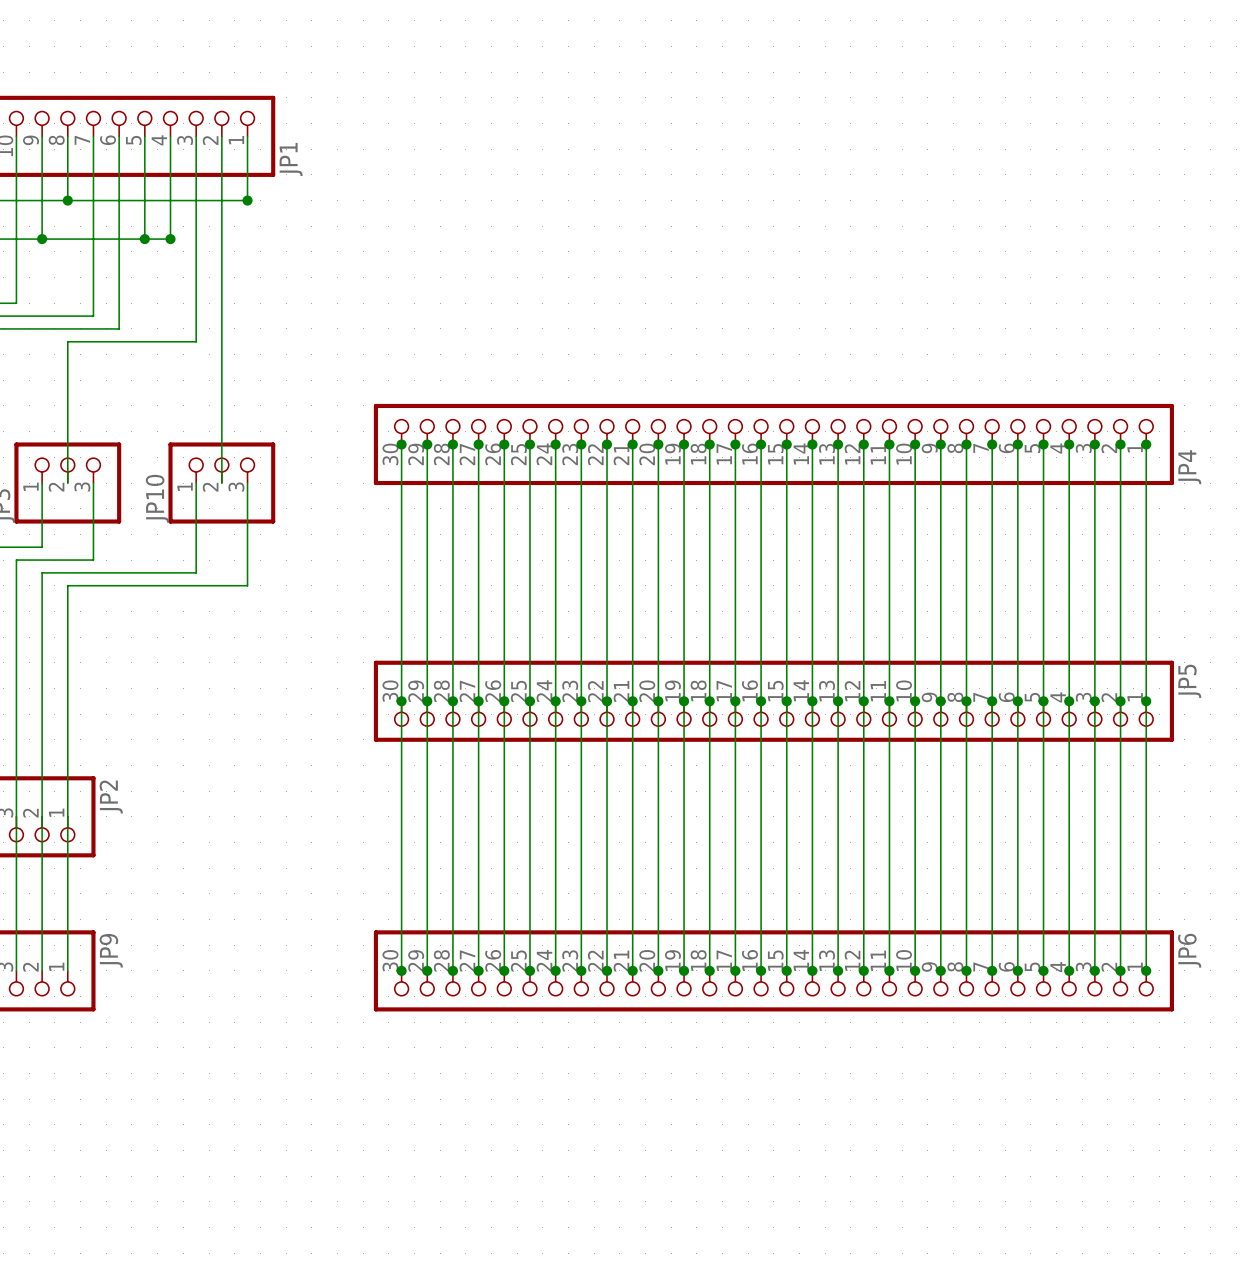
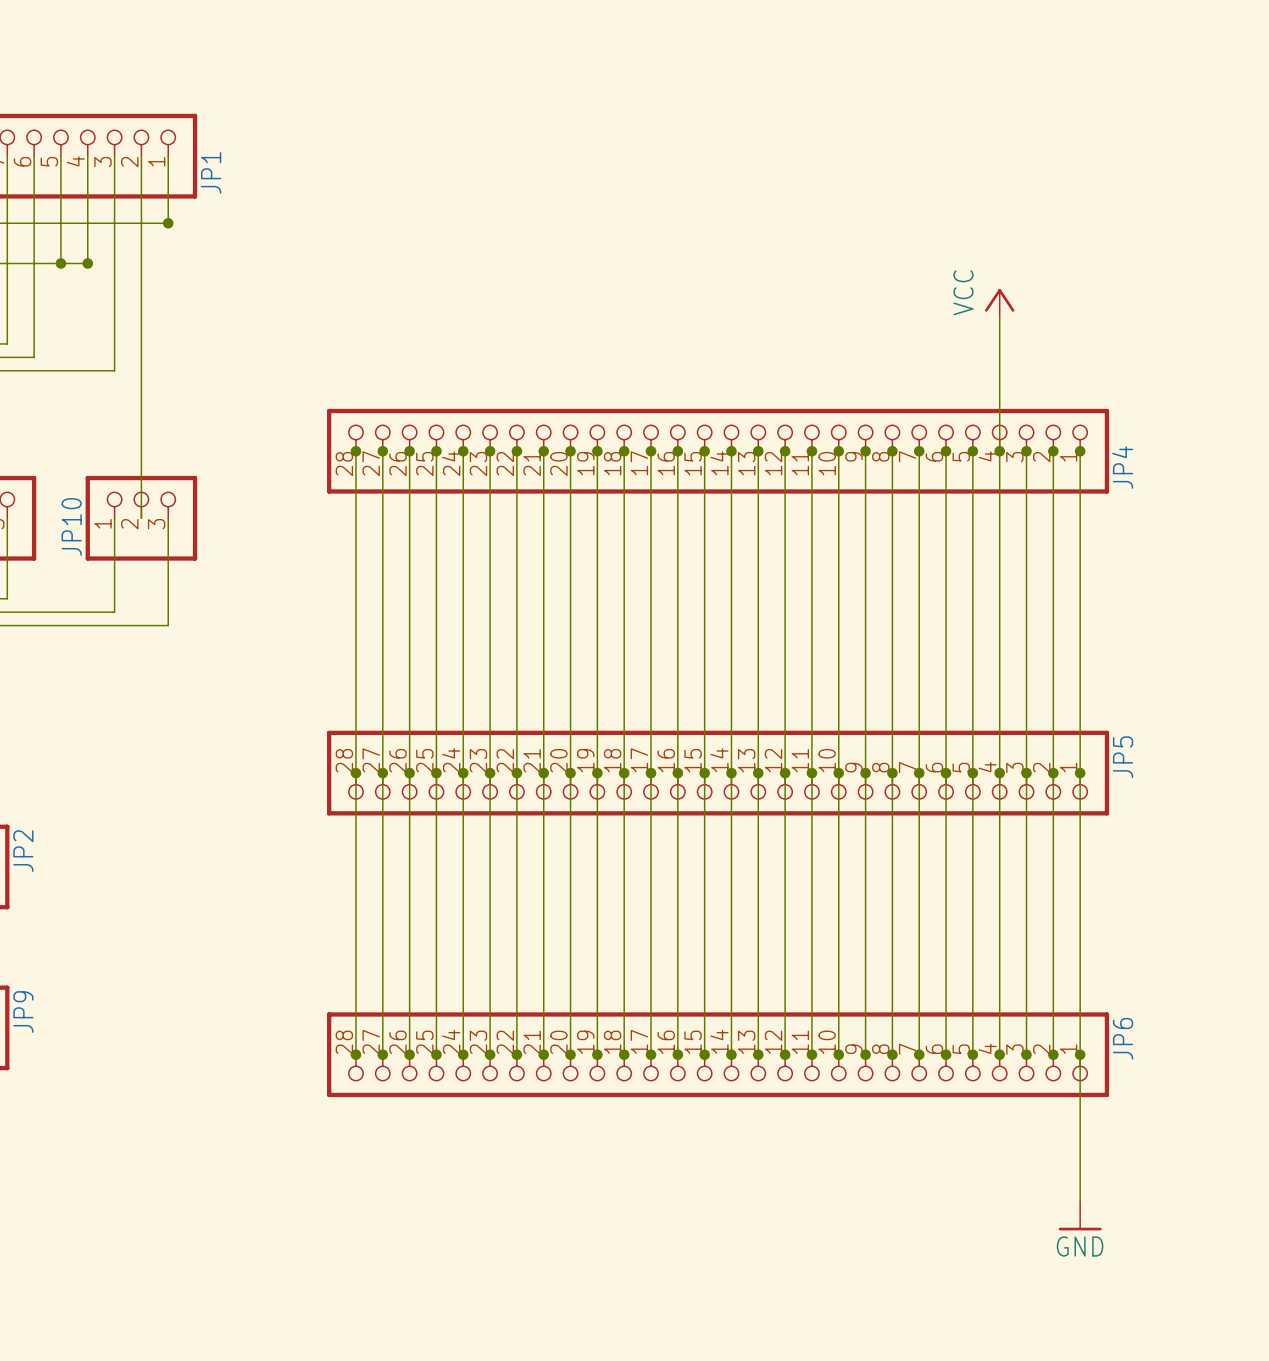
power symbol: none -> VCC (999, 303)
wire: none -> (999, 317) (999, 478)
JP4 symbol: [373, 403, 1174, 486] -> [327, 408, 1110, 494]
wire: none -> (355, 451) (355, 478)
junction: none -> (355, 451)
wire: none -> (382, 451) (382, 478)
junction: none -> (382, 451)
wire: none -> (409, 451) (409, 478)
junction: none -> (409, 451)
wire: none -> (436, 451) (436, 478)
junction: none -> (436, 451)
wire: none -> (463, 451) (463, 478)
junction: none -> (463, 451)
wire: none -> (490, 451) (490, 478)
junction: none -> (490, 451)
wire: none -> (516, 451) (516, 478)
junction: none -> (516, 451)
wire: none -> (543, 451) (543, 478)
junction: none -> (543, 451)
wire: none -> (570, 451) (570, 478)
junction: none -> (570, 451)
wire: none -> (597, 451) (597, 478)
junction: none -> (597, 451)
wire: none -> (624, 451) (624, 478)
junction: none -> (624, 451)
wire: none -> (651, 451) (651, 478)
junction: none -> (651, 451)
wire: none -> (677, 451) (677, 478)
junction: none -> (677, 451)
wire: none -> (704, 451) (704, 478)
junction: none -> (704, 451)
wire: none -> (731, 451) (731, 478)
junction: none -> (731, 451)
wire: none -> (758, 451) (758, 478)
junction: none -> (758, 451)
wire: none -> (785, 451) (785, 478)
junction: none -> (785, 451)
wire: none -> (811, 451) (811, 478)
junction: none -> (811, 451)
wire: none -> (838, 451) (838, 478)
junction: none -> (838, 451)
wire: none -> (865, 451) (865, 478)
junction: none -> (865, 451)
wire: none -> (892, 451) (892, 478)
junction: none -> (892, 451)
wire: none -> (919, 451) (919, 478)
junction: none -> (919, 451)
wire: none -> (946, 451) (946, 478)
junction: none -> (946, 451)
wire: none -> (972, 451) (972, 478)
junction: none -> (972, 451)
junction: none -> (999, 451)
wire: none -> (1026, 451) (1026, 478)
junction: none -> (1026, 451)
wire: none -> (1053, 451) (1053, 478)
junction: none -> (1053, 451)
wire: none -> (1080, 451) (1080, 478)
junction: none -> (1080, 451)
wire: (401, 444) (401, 970) -> none
junction: (401, 444) -> none
junction: (427, 444) -> none
junction: (452, 444) -> none
junction: (478, 444) -> none
junction: (504, 444) -> none
junction: (529, 444) -> none
junction: (555, 444) -> none
junction: (581, 444) -> none
junction: (607, 444) -> none
junction: (632, 444) -> none
junction: (658, 444) -> none
junction: (684, 444) -> none
junction: (709, 444) -> none
junction: (735, 444) -> none
junction: (761, 444) -> none
junction: (786, 444) -> none
junction: (812, 444) -> none
junction: (838, 444) -> none
junction: (863, 444) -> none
junction: (889, 444) -> none
junction: (915, 444) -> none
junction: (940, 444) -> none
junction: (966, 444) -> none
junction: (992, 444) -> none
junction: (1017, 444) -> none
junction: (1043, 444) -> none
junction: (1069, 444) -> none
junction: (1094, 444) -> none
junction: (1120, 444) -> none
wire: (1146, 444) (1146, 970) -> none
junction: (1146, 444) -> none
JP4 name position: JP4 (1189, 467) -> JP4 (1122, 467)
JP5 symbol: [373, 660, 1174, 742] -> [327, 730, 1110, 816]
JP5 name position: JP5 (1189, 681) -> JP5 (1123, 757)
junction: (401, 701) -> none
junction: (427, 701) -> none
junction: (452, 701) -> none
junction: (478, 701) -> none
junction: (504, 701) -> none
junction: (529, 701) -> none
junction: (555, 701) -> none
junction: (581, 701) -> none
junction: (607, 701) -> none
junction: (632, 701) -> none
junction: (658, 701) -> none
junction: (684, 701) -> none
junction: (709, 701) -> none
junction: (735, 701) -> none
junction: (761, 701) -> none
junction: (786, 701) -> none
junction: (812, 701) -> none
junction: (838, 701) -> none
junction: (863, 701) -> none
junction: (889, 701) -> none
junction: (915, 701) -> none
junction: (940, 701) -> none
junction: (966, 701) -> none
junction: (992, 701) -> none
junction: (1017, 701) -> none
junction: (1043, 701) -> none
junction: (1069, 701) -> none
junction: (1094, 701) -> none
junction: (1120, 701) -> none
junction: (1146, 701) -> none
junction: none -> (355, 773)
junction: none -> (382, 773)
junction: none -> (409, 773)
junction: none -> (436, 773)
junction: none -> (463, 773)
junction: none -> (490, 773)
junction: none -> (516, 773)
junction: none -> (543, 773)
junction: none -> (570, 773)
junction: none -> (597, 773)
junction: none -> (624, 773)
junction: none -> (651, 773)
junction: none -> (677, 773)
junction: none -> (704, 773)
junction: none -> (731, 773)
junction: none -> (758, 773)
junction: none -> (785, 773)
junction: none -> (811, 773)
junction: none -> (838, 773)
junction: none -> (865, 773)
junction: none -> (892, 773)
junction: none -> (919, 773)
junction: none -> (946, 773)
junction: none -> (972, 773)
junction: none -> (999, 773)
junction: none -> (1026, 773)
junction: none -> (1053, 773)
junction: none -> (1080, 773)
JP6 symbol: [373, 930, 1174, 1012] -> [327, 1012, 1110, 1098]
JP6 name position: JP6 (1189, 950) -> JP6 (1123, 1038)
junction: (401, 970) -> none
wire: none -> (355, 1027) (355, 1054)
junction: (427, 970) -> none
wire: none -> (382, 1027) (382, 1054)
junction: (452, 970) -> none
wire: none -> (409, 1027) (409, 1054)
junction: (478, 970) -> none
wire: none -> (436, 1027) (436, 1054)
junction: (504, 970) -> none
wire: none -> (463, 1027) (463, 1054)
junction: (529, 970) -> none
wire: none -> (490, 1027) (490, 1054)
junction: (555, 970) -> none
wire: none -> (516, 1027) (516, 1054)
junction: (581, 970) -> none
wire: none -> (543, 1027) (543, 1054)
junction: (607, 970) -> none
wire: none -> (570, 1027) (570, 1054)
junction: (632, 970) -> none
wire: none -> (597, 1027) (597, 1054)
junction: (658, 970) -> none
wire: none -> (624, 1027) (624, 1054)
junction: (684, 970) -> none
wire: none -> (651, 1027) (651, 1054)
junction: (709, 970) -> none
wire: none -> (677, 1027) (677, 1054)
junction: (735, 970) -> none
wire: none -> (704, 1027) (704, 1054)
junction: (761, 970) -> none
wire: none -> (731, 1027) (731, 1054)
junction: (786, 970) -> none
wire: none -> (758, 1027) (758, 1054)
junction: (812, 970) -> none
wire: none -> (785, 1027) (785, 1054)
junction: (838, 970) -> none
wire: none -> (811, 1027) (811, 1054)
junction: (863, 970) -> none
wire: none -> (838, 1027) (838, 1054)
junction: (889, 970) -> none
wire: none -> (865, 1027) (865, 1054)
junction: (915, 970) -> none
wire: none -> (892, 1027) (892, 1054)
junction: (940, 970) -> none
wire: none -> (919, 1027) (919, 1054)
junction: (966, 970) -> none
wire: none -> (946, 1027) (946, 1054)
junction: (992, 970) -> none
wire: none -> (972, 1027) (972, 1054)
junction: (1017, 970) -> none
wire: none -> (999, 1027) (999, 1054)
junction: (1043, 970) -> none
wire: none -> (1026, 1027) (1026, 1054)
junction: (1069, 970) -> none
wire: none -> (1053, 1027) (1053, 1054)
junction: (1094, 970) -> none
wire: none -> (1080, 1027) (1080, 1202)
junction: (1120, 970) -> none
junction: (1146, 970) -> none
junction: none -> (355, 1054)
junction: none -> (382, 1054)
junction: none -> (409, 1054)
junction: none -> (436, 1054)
junction: none -> (463, 1054)
junction: none -> (490, 1054)
junction: none -> (516, 1054)
junction: none -> (543, 1054)
junction: none -> (570, 1054)
junction: none -> (597, 1054)
junction: none -> (624, 1054)
junction: none -> (651, 1054)
junction: none -> (677, 1054)
junction: none -> (704, 1054)
junction: none -> (731, 1054)
junction: none -> (758, 1054)
junction: none -> (785, 1054)
junction: none -> (811, 1054)
junction: none -> (838, 1054)
junction: none -> (865, 1054)
junction: none -> (892, 1054)
junction: none -> (919, 1054)
junction: none -> (946, 1054)
junction: none -> (972, 1054)
junction: none -> (999, 1054)
junction: none -> (1026, 1054)
junction: none -> (1053, 1054)
junction: none -> (1080, 1054)
power symbol: none -> GND (1080, 1216)

